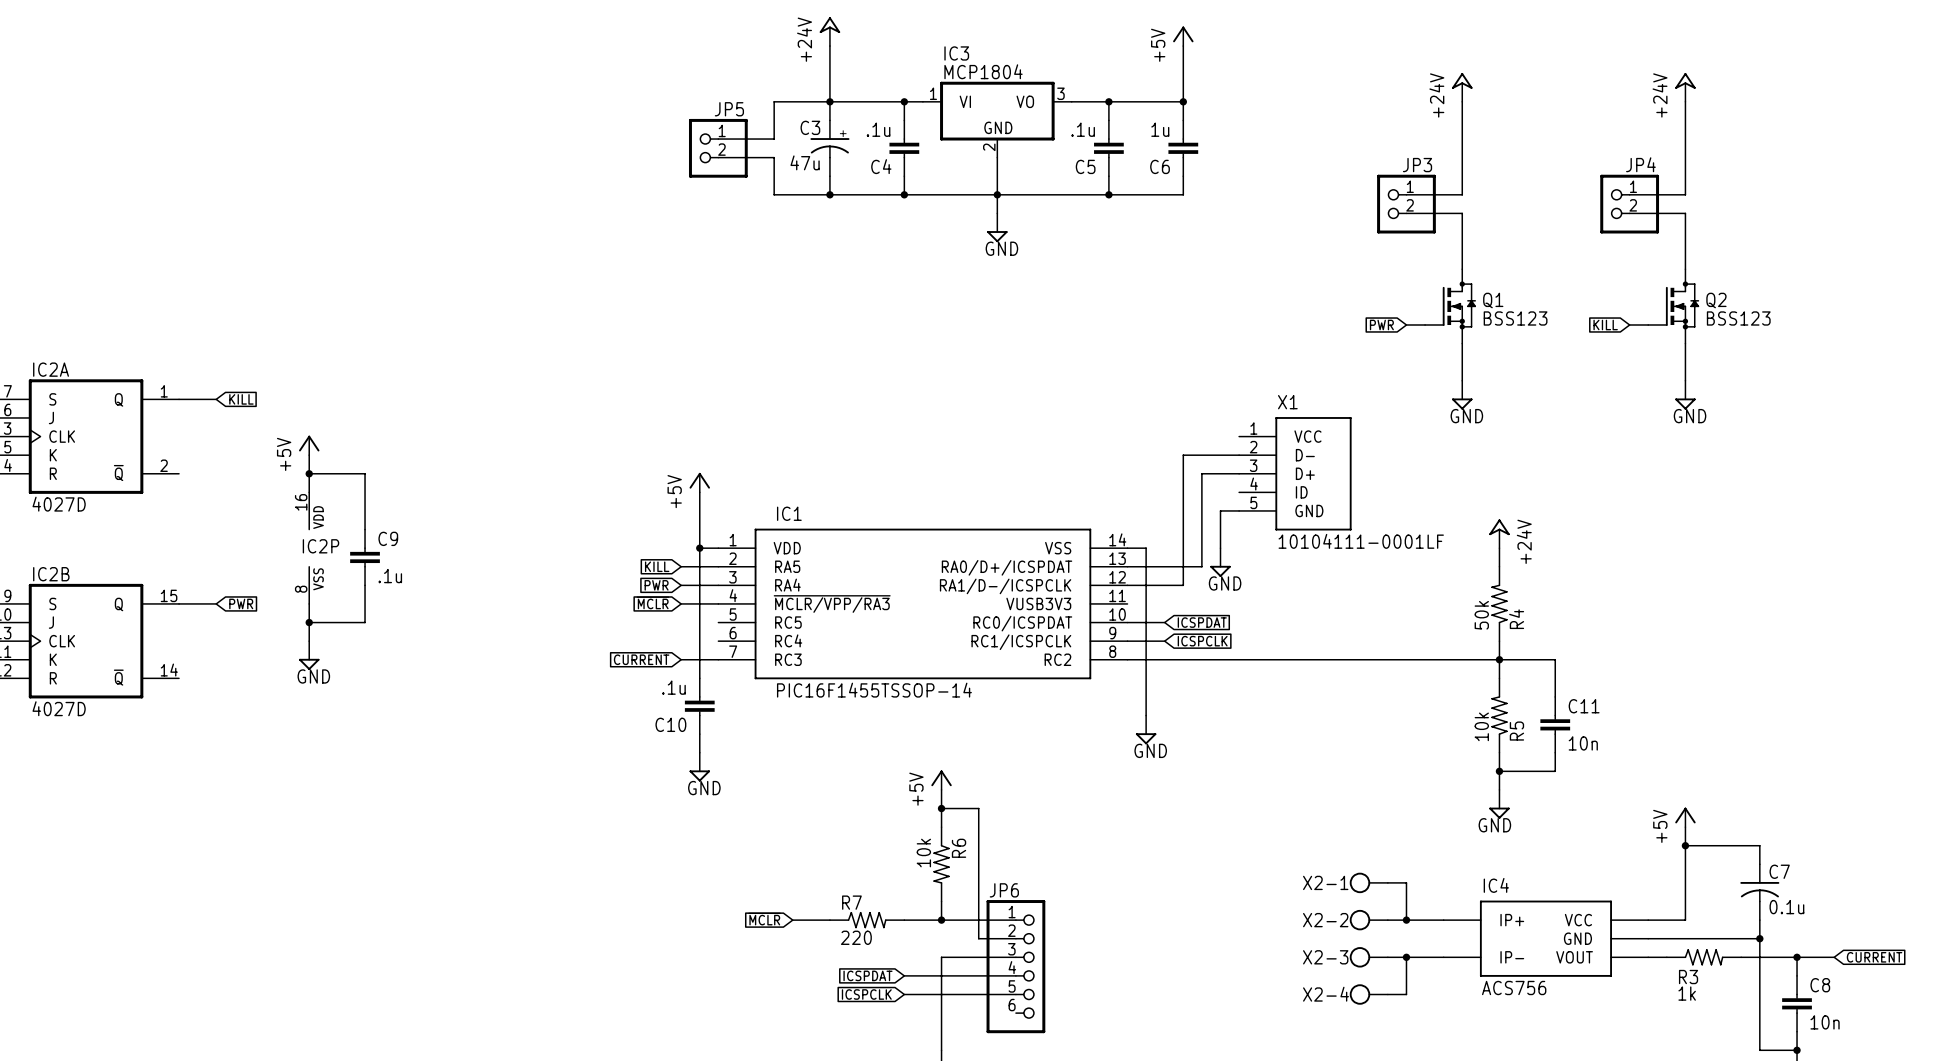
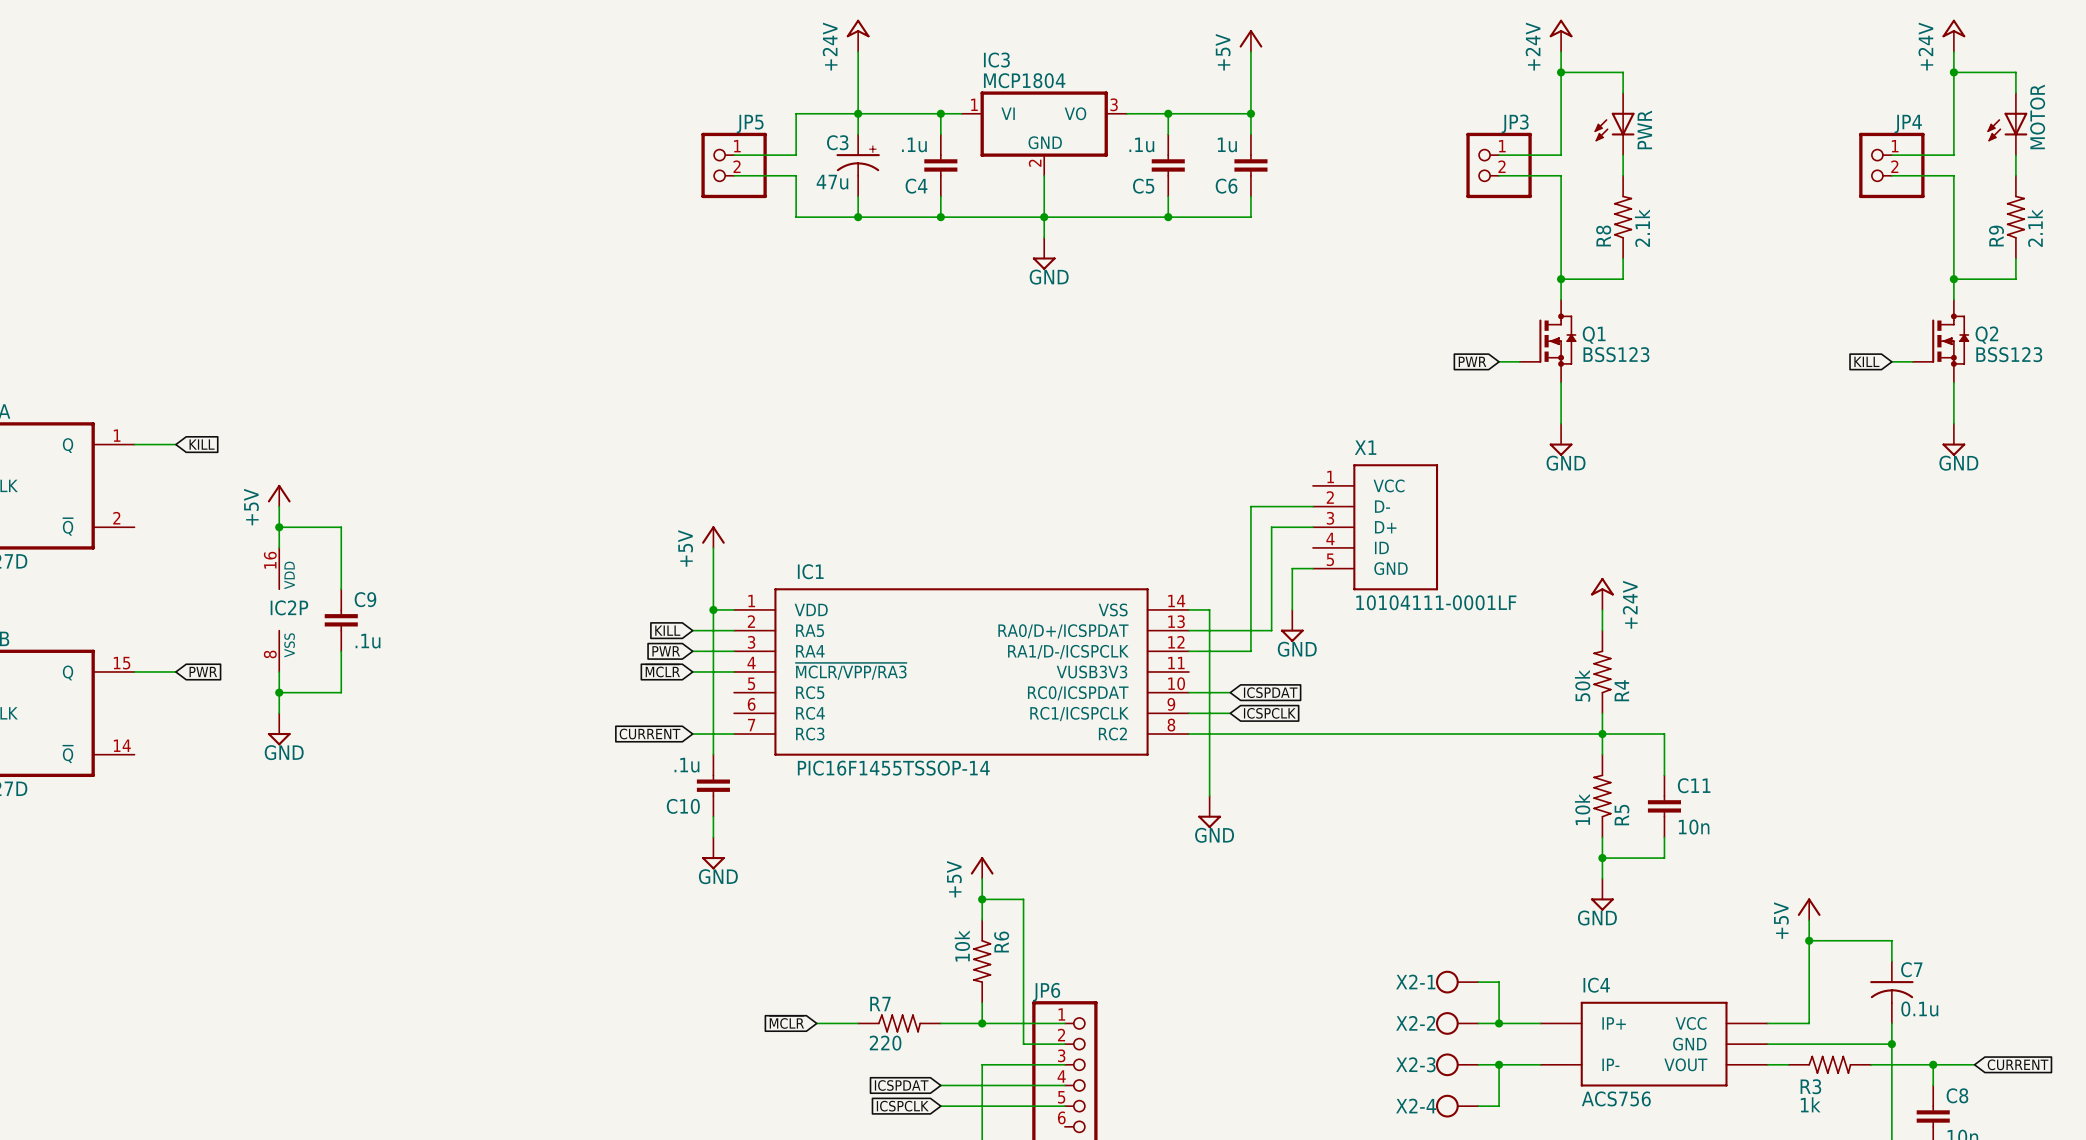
power symbol: none -> +24V (1953, 35)
wire: none -> (1561, 51) (1561, 113)
wire: none -> (1561, 72) (1623, 72) (1623, 93)
junction: none -> (1561, 72)
wire: none -> (1953, 72) (2015, 72) (2015, 93)
junction: none -> (1953, 72)
power symbol position: +24V (1462, 87) -> +24V (1561, 35)
power symbol: +24V (1685, 87) -> none
wire: (1685, 101) (1685, 194) (1629, 194) -> (1953, 51) (1953, 155) (1891, 155)
PWR: none -> (1614, 124)
MOTOR: none -> (2007, 124)
wire: (1462, 139) (1462, 157) -> (1561, 155) (1499, 155)
wire: none -> (1623, 155) (1623, 175)
wire: none -> (2015, 155) (2015, 175)
wire: none -> (1891, 175) (1953, 175) (1953, 299)
wire: (1406, 194) (1462, 194) -> (1561, 237) (1561, 217)
R8: none -> 2.1k (1623, 217)
R9: none -> 2.1k (2015, 217)
JP3 position: (1406, 204) -> (1499, 165)
JP4 position: (1629, 204) -> (1891, 165)
wire: (1406, 213) (1462, 213) -> (1499, 175) (1561, 175)
wire: (1629, 213) (1685, 213) (1685, 269) -> none
wire: none -> (1623, 258) (1623, 279) (1561, 279)
wire: none -> (2015, 258) (2015, 279) (1953, 279)
junction: none -> (1561, 279)
junction: none -> (1953, 279)
Q2 position: (1673, 306) -> (1940, 341)
global label position: KILL (1605, 325) -> KILL (1866, 361)
wire: (1629, 325) (1648, 325) -> (1891, 361) (1912, 361)
wire: (1685, 343) (1685, 380) -> (1953, 382) (1953, 423)
power symbol position: GND (1685, 395) -> GND (1953, 439)

